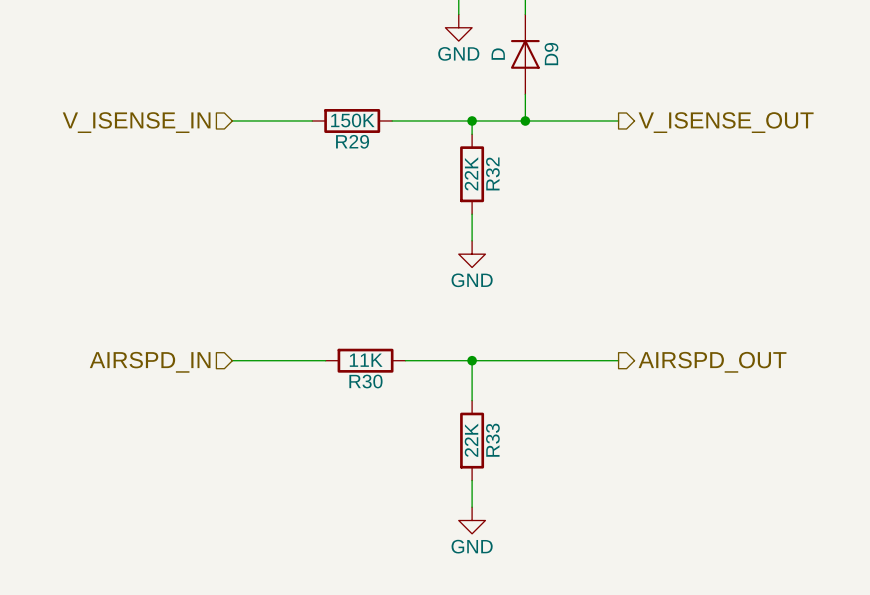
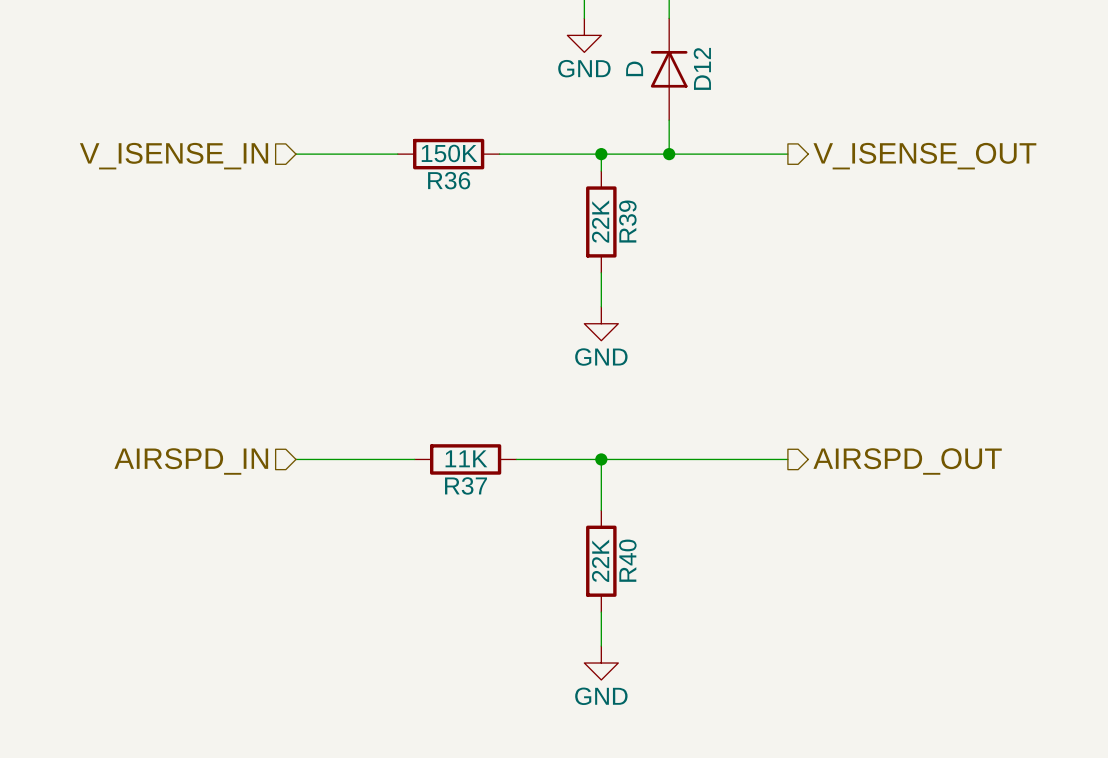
D9 name: D9 (551, 54) -> D12 (702, 68)
R29 name: R29 (352, 141) -> R36 (449, 180)
R32 name: R32 (492, 173) -> R39 (627, 221)
R30 name: R30 (365, 381) -> R37 (466, 485)
R33 name: R33 (492, 440) -> R40 (627, 560)

